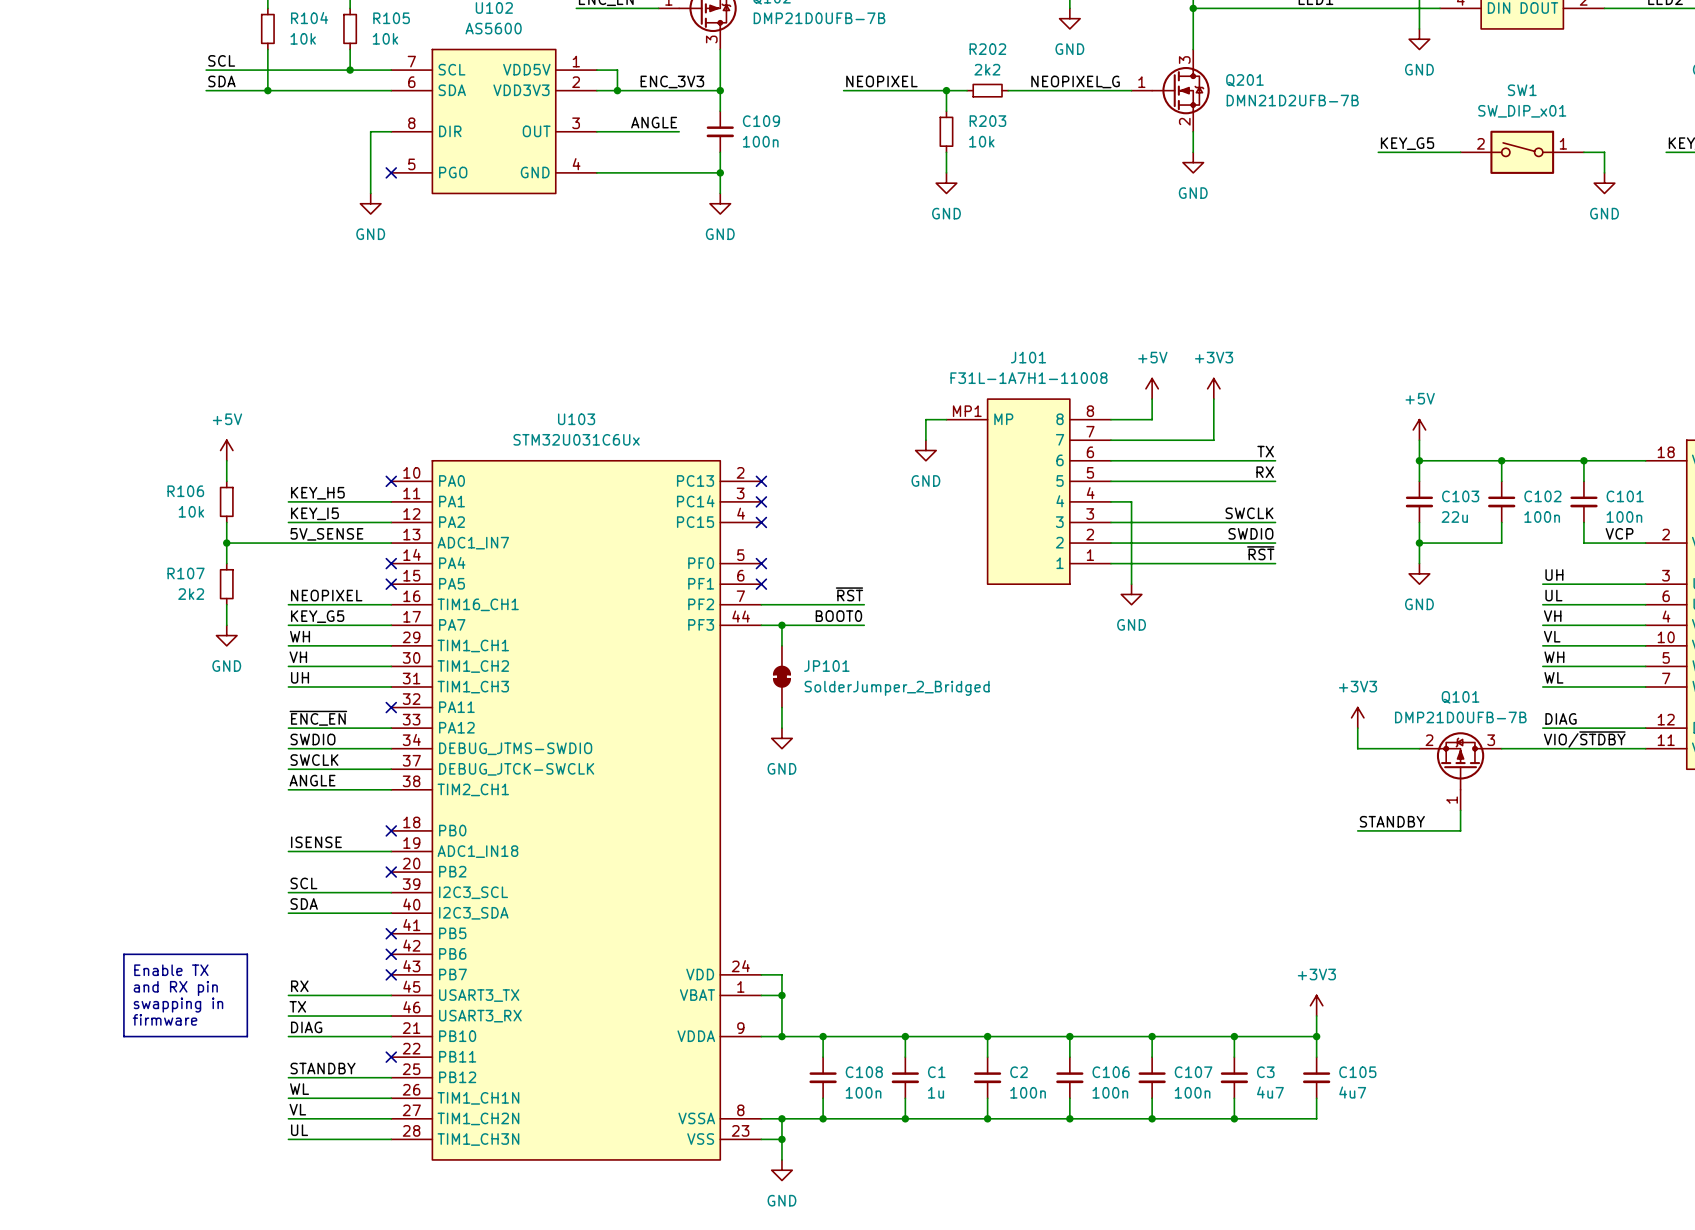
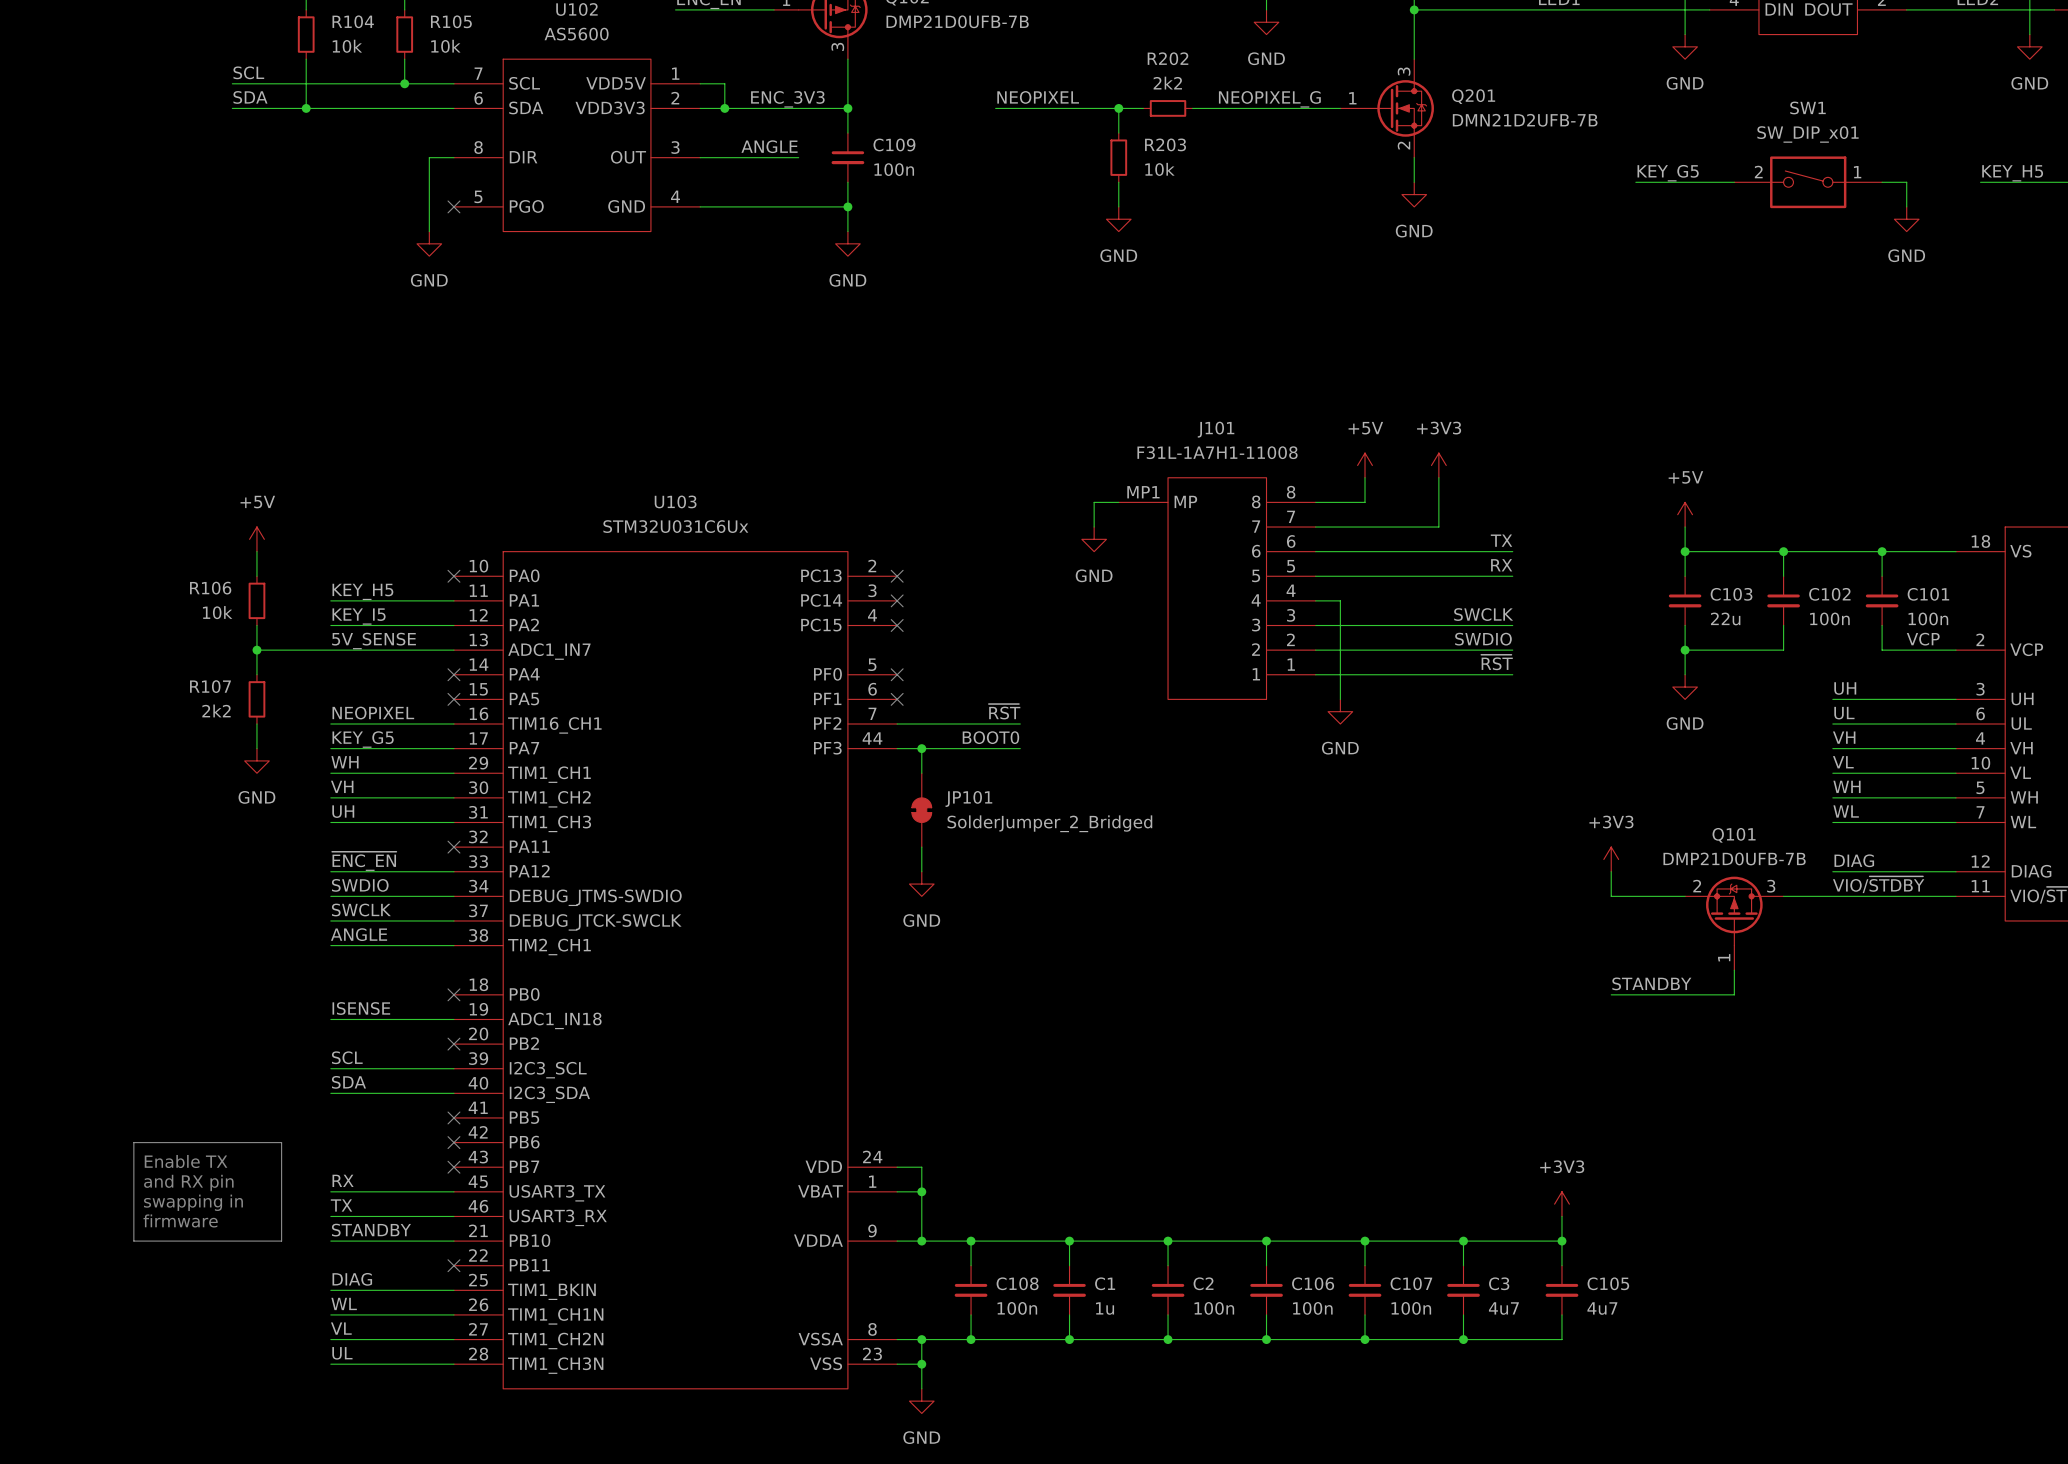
label: DIAG (306, 1027) -> STANDBY (371, 1230)
label: STANDBY (323, 1068) -> DIAG (352, 1279)
U103 pin name: PB12 (457, 1077) -> TIM1_BKIN (551, 1291)

